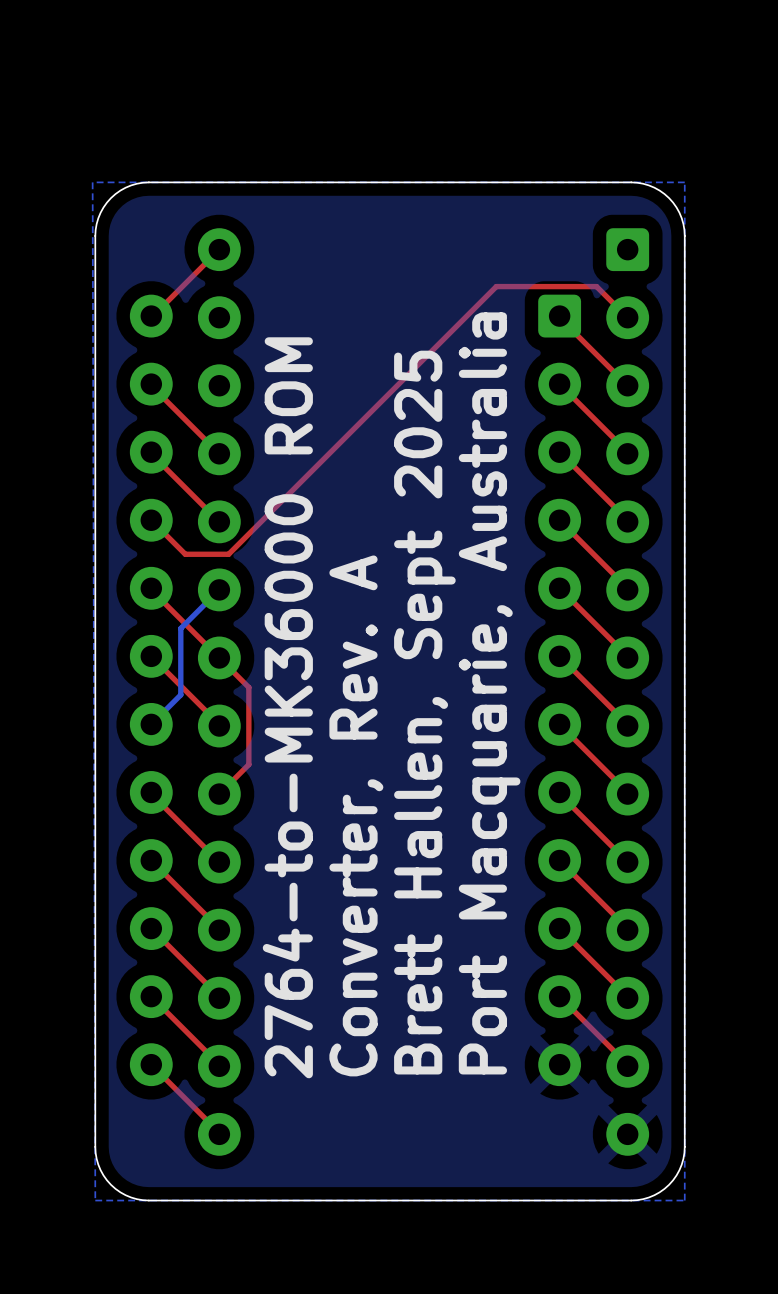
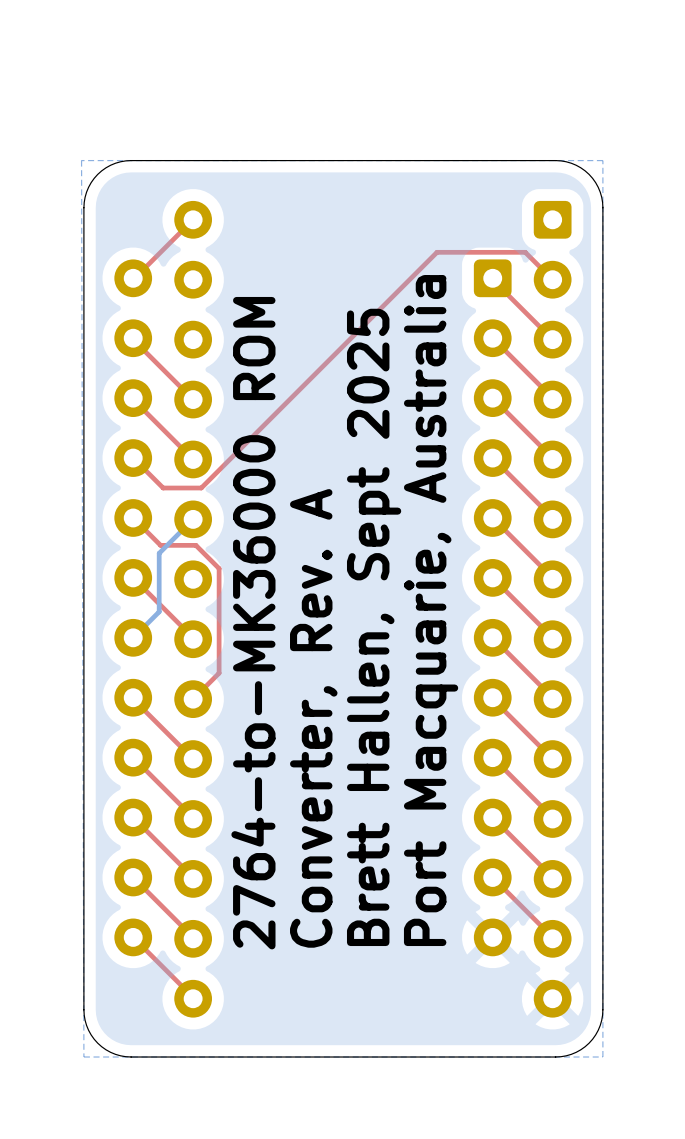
top track: (151, 589) (248, 687) -> (133, 517) (160, 545) (195, 545) (219, 568) (219, 605)

